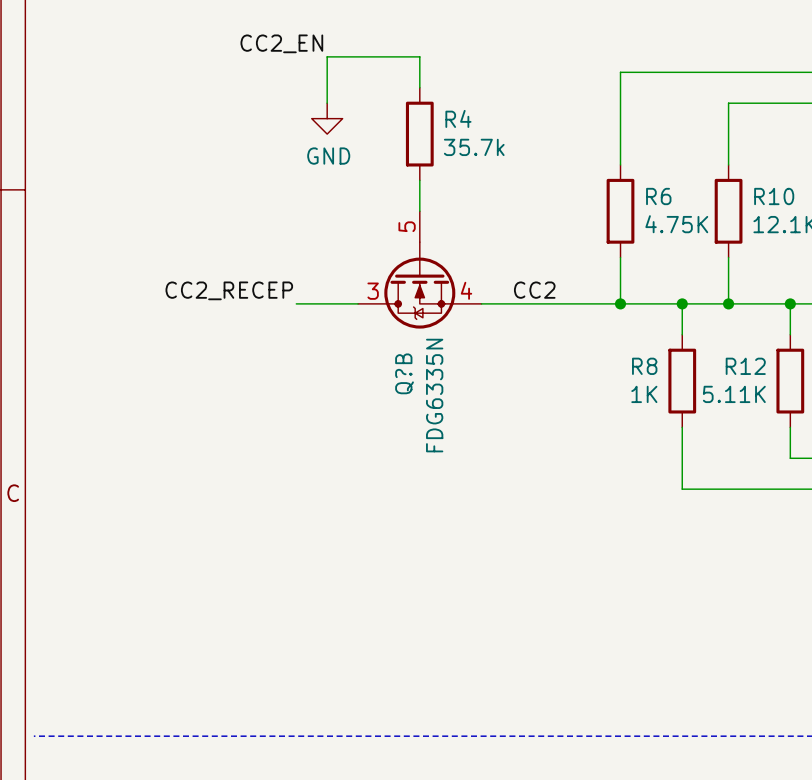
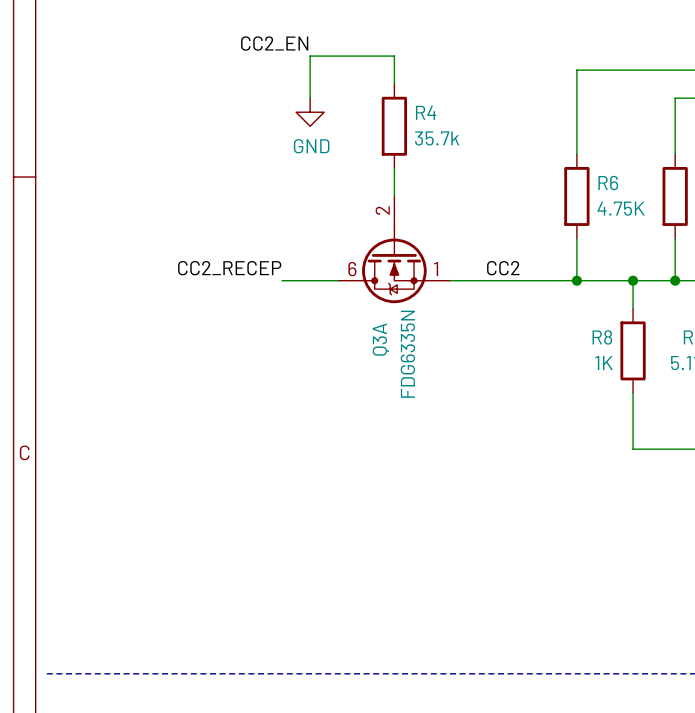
Q?B pin number: 5 (407, 226) -> 2 (382, 210)
Q?B pin number: 4 (466, 290) -> 1 (436, 269)
Q?B pin number: 3 (373, 291) -> 6 (352, 269)
Q?B name: Q?B (404, 373) -> Q3A (380, 339)

